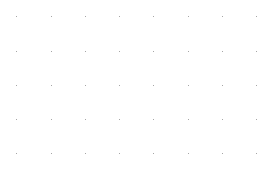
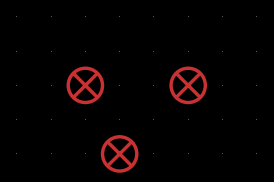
part: none -> (85, 85)
part: none -> (188, 85)
part: none -> (119, 153)

